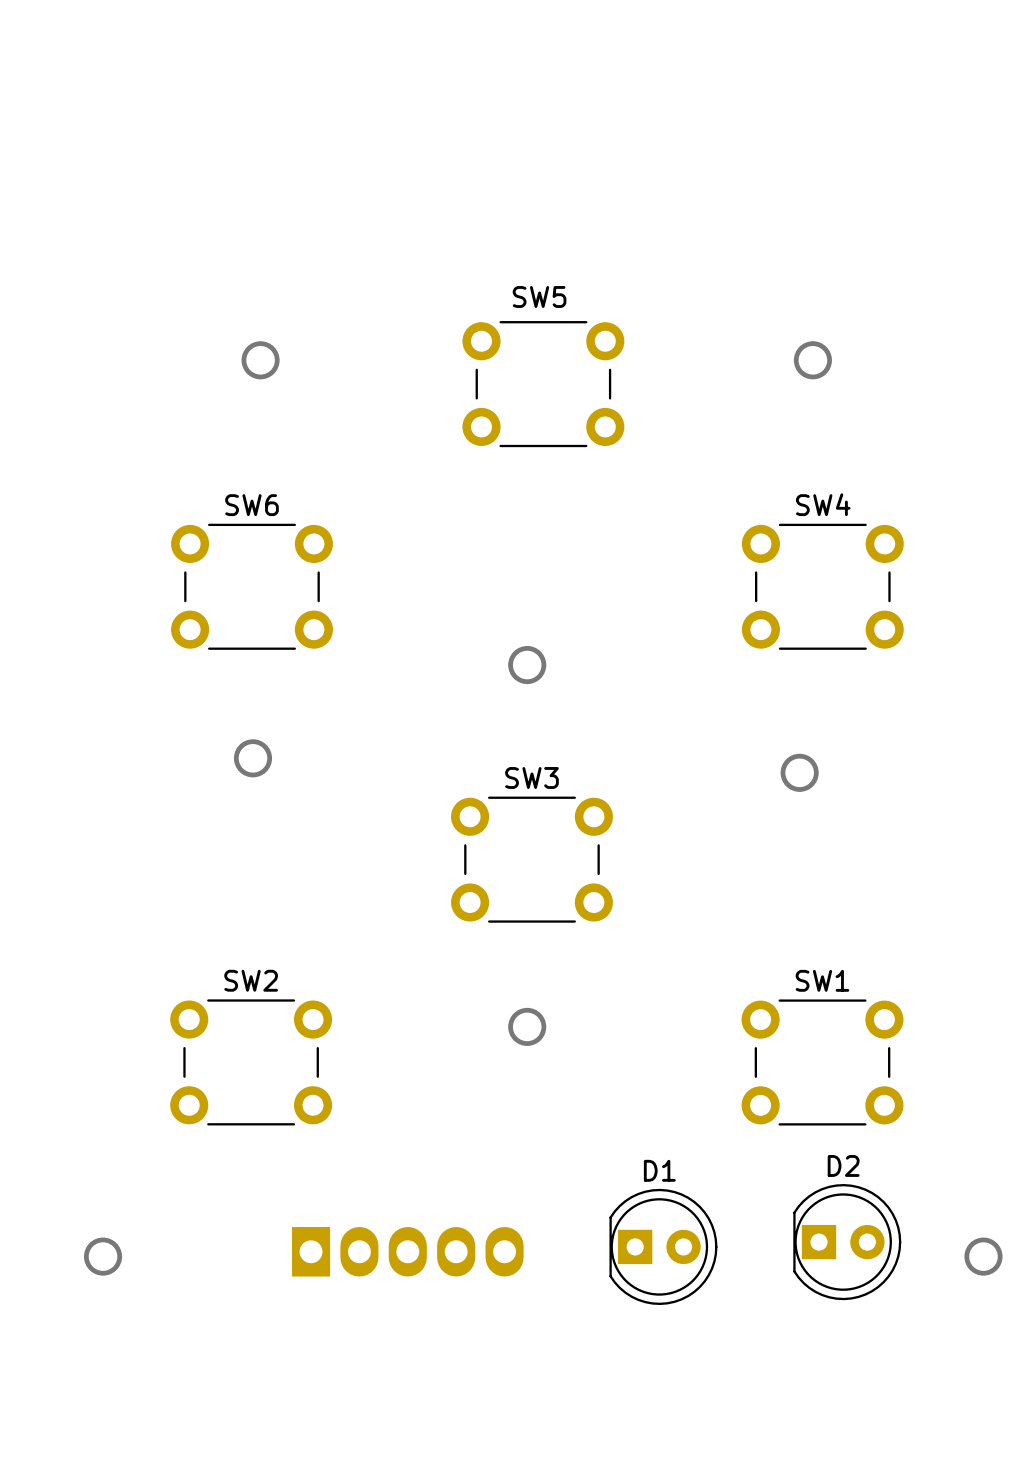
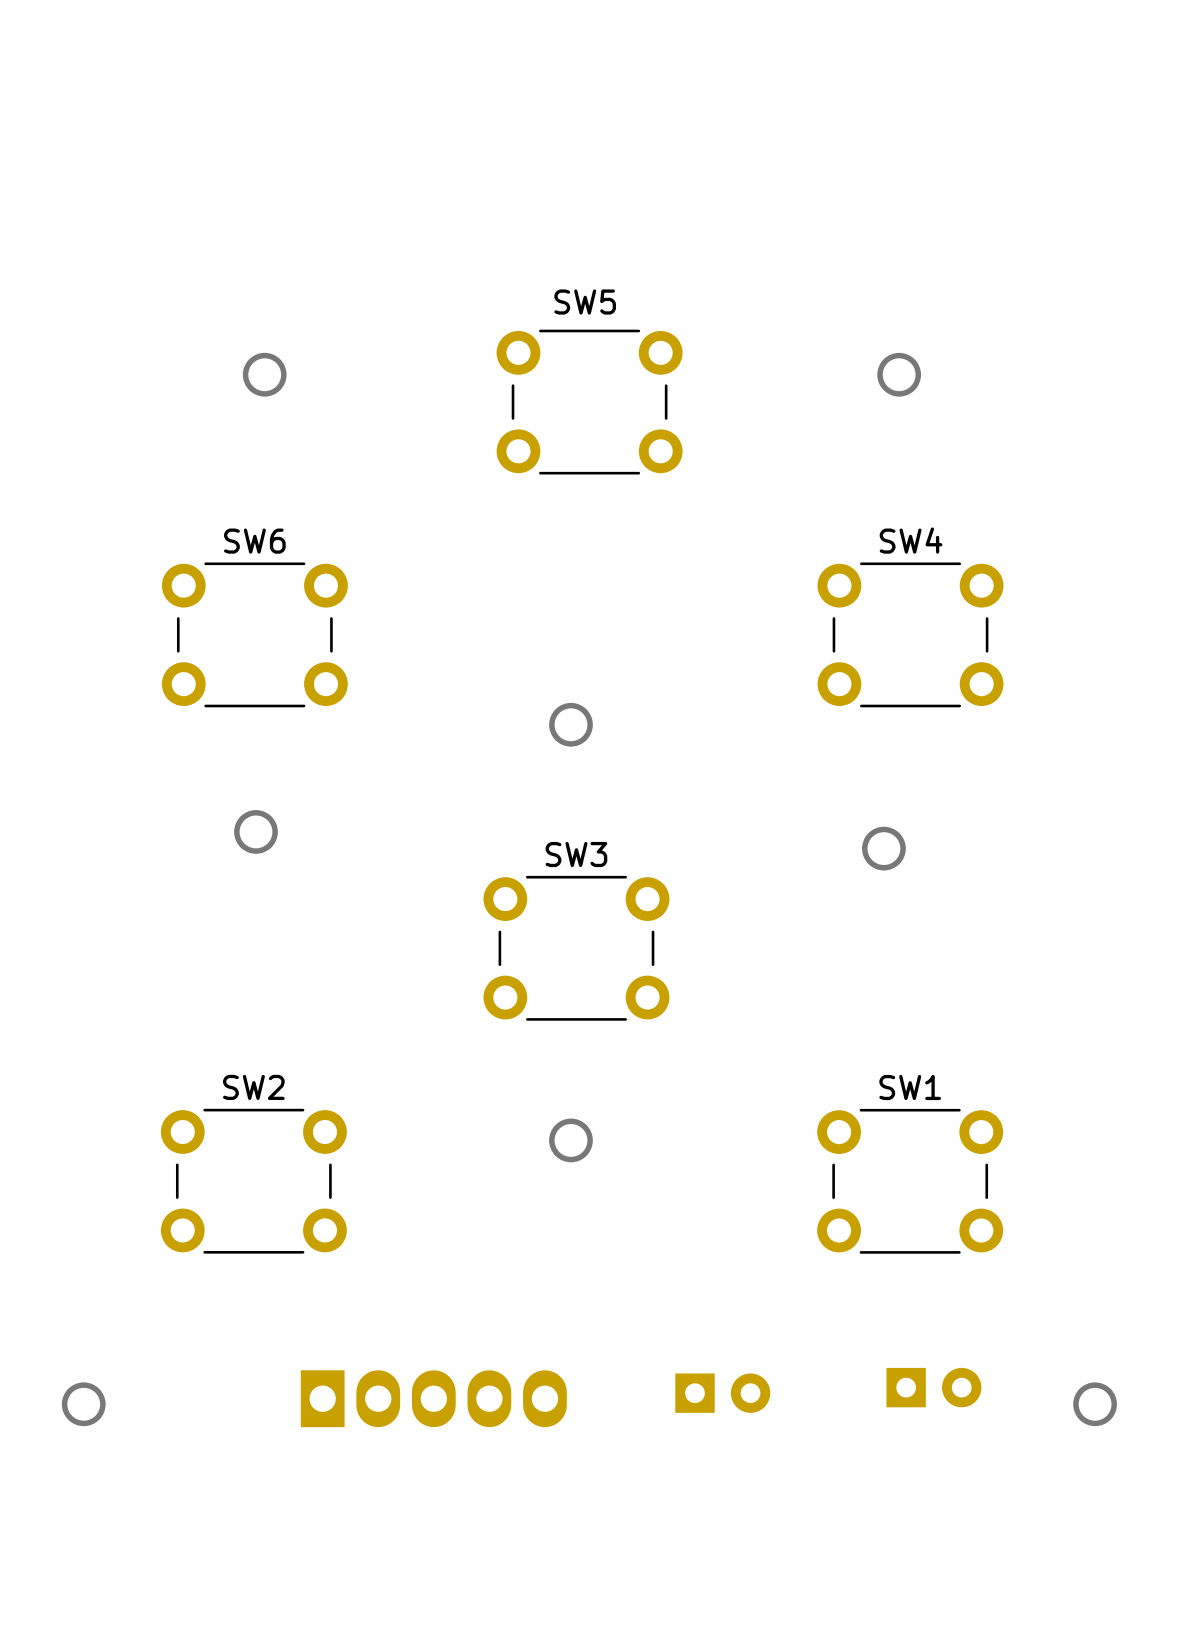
D2 side: top (847, 1242) -> bottom (933, 1387)
D1 side: top (663, 1246) -> bottom (722, 1393)

